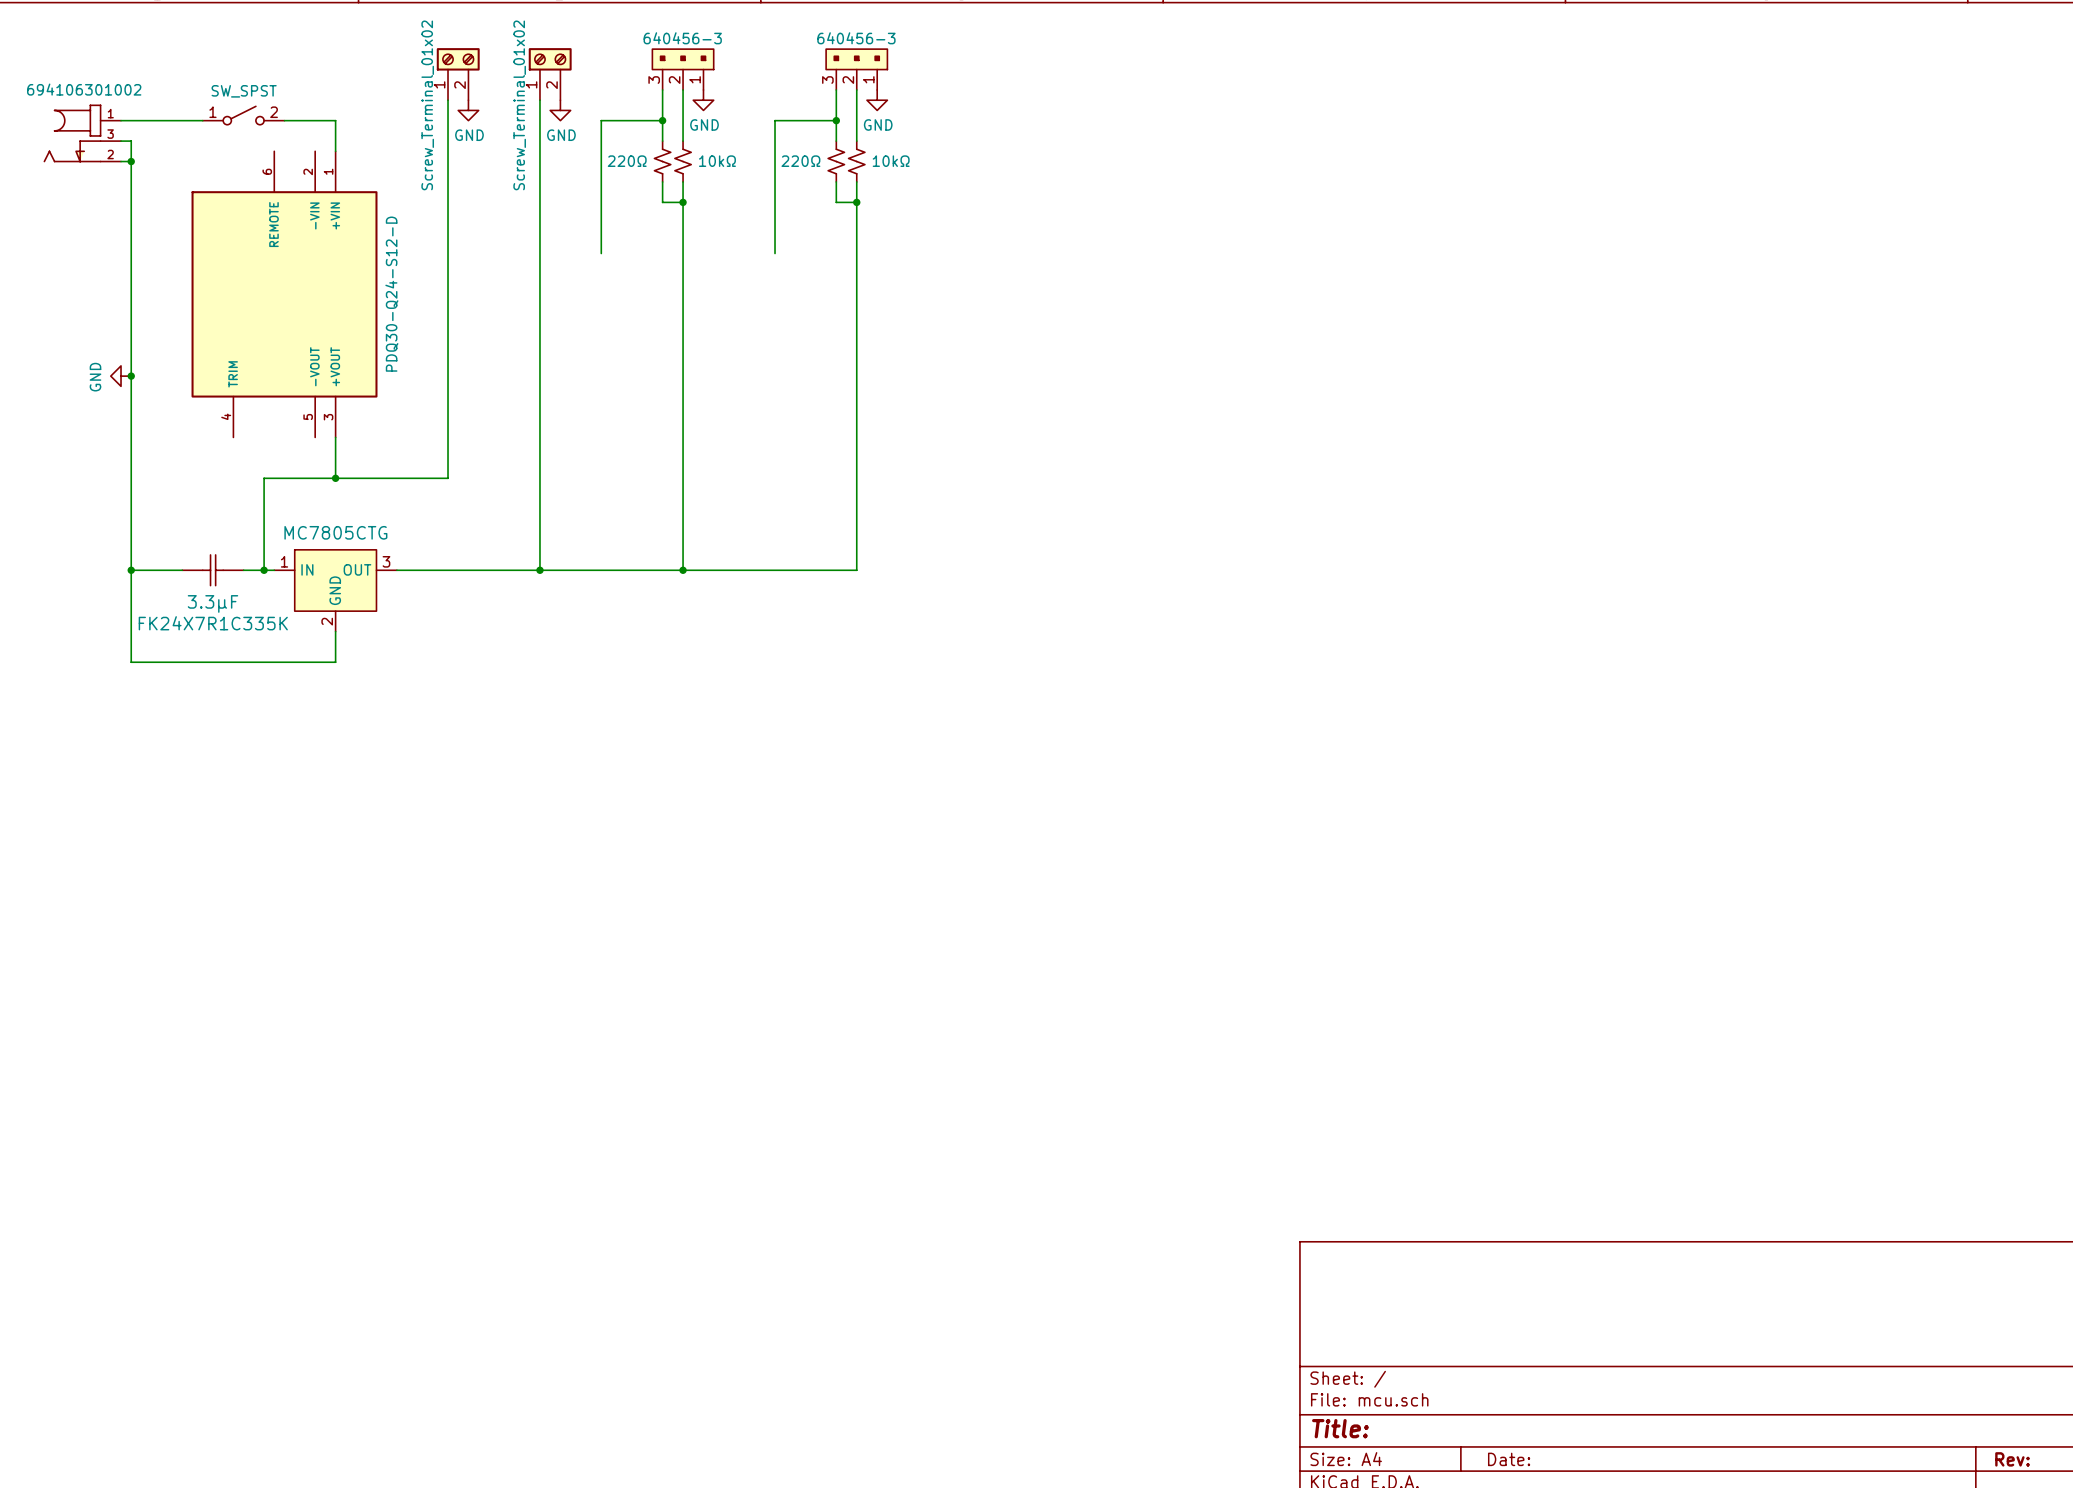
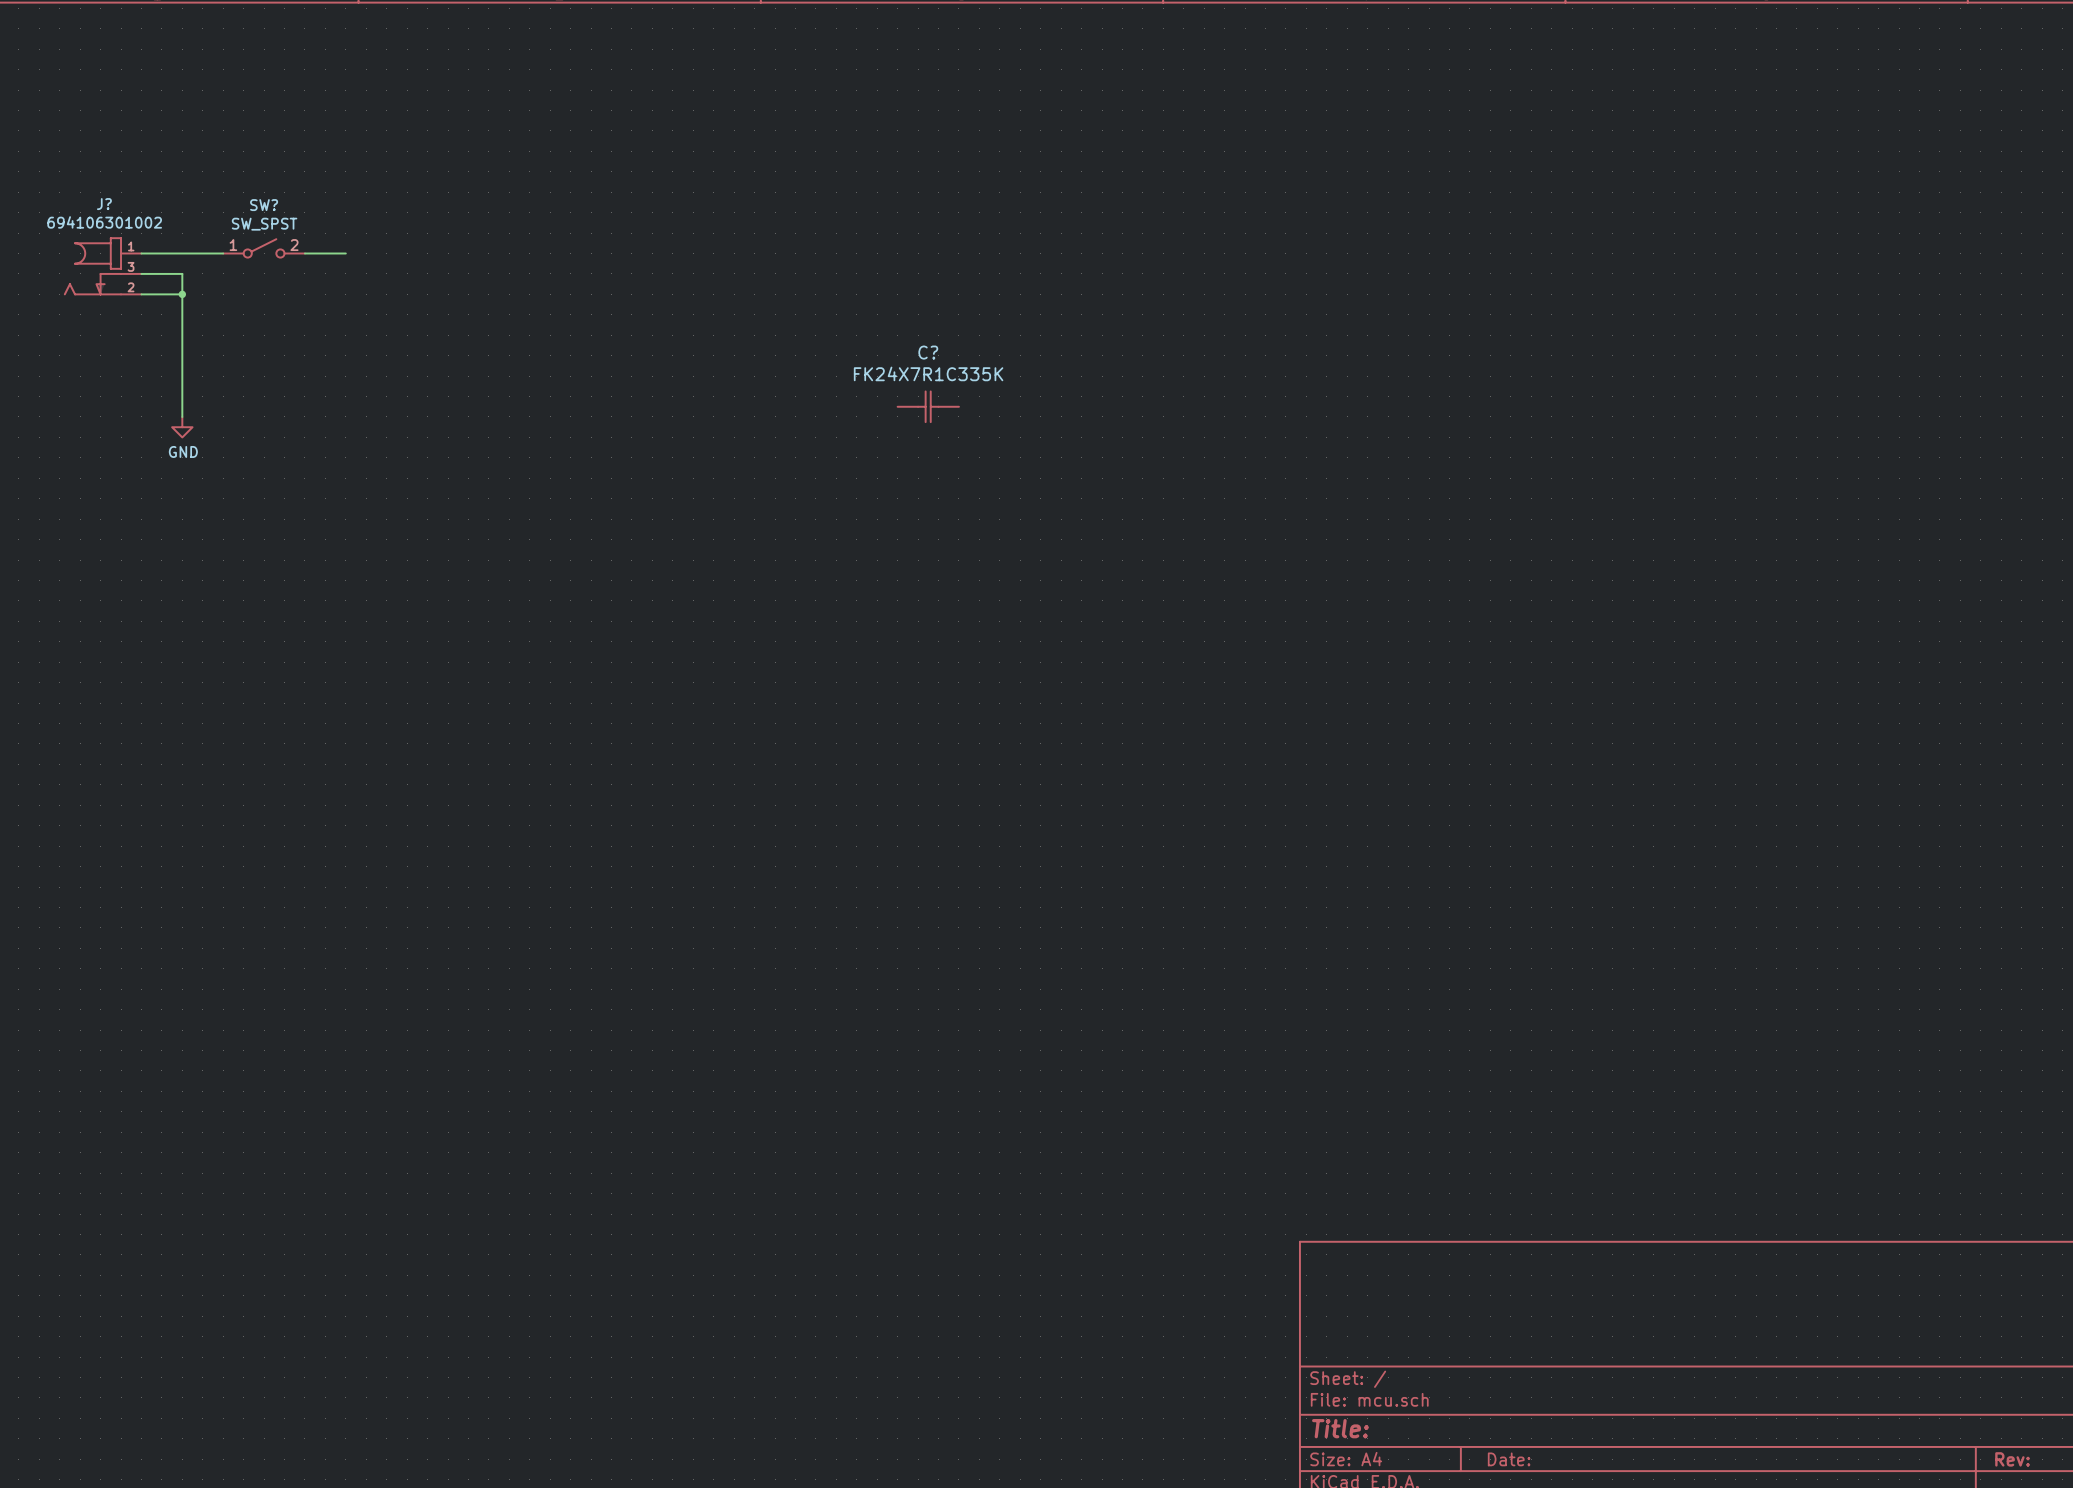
part: 640456-3 (683, 69) -> none
part: 640456-3 (856, 69) -> none
part: Screw_Terminal_01x02 (458, 74) -> none
part: Screw_Terminal_01x02 (550, 74) -> none
wire: (662, 90) (662, 141) -> none
wire: (683, 90) (683, 141) -> none
wire: (836, 90) (836, 141) -> none
wire: (856, 90) (856, 141) -> none
wire: (448, 100) (448, 478) (264, 478) (264, 570) -> none
wire: (539, 100) (539, 570) -> none
power symbol: GND (703, 100) -> none
power symbol: GND (877, 100) -> none
power symbol: GND (468, 110) -> none
power symbol: GND (560, 110) -> none
part: SW_SPST (243, 115) -> none
wire: (121, 120) (202, 120) -> (141, 253) (223, 253)
wire: (284, 120) (335, 120) (335, 151) -> none
wire: (662, 120) (601, 120) (601, 253) -> none
junction: (662, 120) -> none
wire: (836, 120) (775, 120) (775, 253) -> none
junction: (836, 120) -> none
part: 694106301002 (82, 133) -> none
wire: (121, 141) (131, 141) (131, 662) (335, 662) (335, 631) -> none
wire: (121, 161) (131, 161) -> none
junction: (131, 161) -> none
part: 220Ω (662, 161) -> none
part: 10kΩ (683, 161) -> none
part: 220Ω (836, 161) -> none
part: 10kΩ (856, 161) -> none
wire: (662, 181) (662, 202) (683, 202) -> none
wire: (683, 181) (683, 570) -> none
wire: (836, 181) (836, 202) (856, 202) -> none
wire: (856, 181) (856, 570) (396, 570) -> none
junction: (683, 202) -> none
junction: (856, 202) -> none
SW?: none -> SW_SPST (264, 248)
J?: none -> 694106301002 (102, 266)
wire: none -> (141, 273) (182, 273) (182, 416)
wire: none -> (141, 294) (182, 294)
junction: none -> (182, 294)
part: PDQ30-Q24-S12-D (284, 294) -> none
power symbol rotation: 0° (121, 376) -> 90° counterclockwise (182, 427)
power symbol position: GND (121, 376) -> GND (182, 427)
junction: (131, 376) -> none
C?: none -> FK24X7R1C335K (928, 406)
wire: (335, 437) (335, 478) -> none
junction: (335, 478) -> none
wire: (131, 570) (182, 570) -> none
junction: (131, 570) -> none
FK24X7R1C335K: 3.3μF (212, 570) -> none
wire: (243, 570) (274, 570) -> none
junction: (264, 570) -> none
junction: (539, 570) -> none
junction: (683, 570) -> none
part: MC7805CTG (335, 590) -> none

